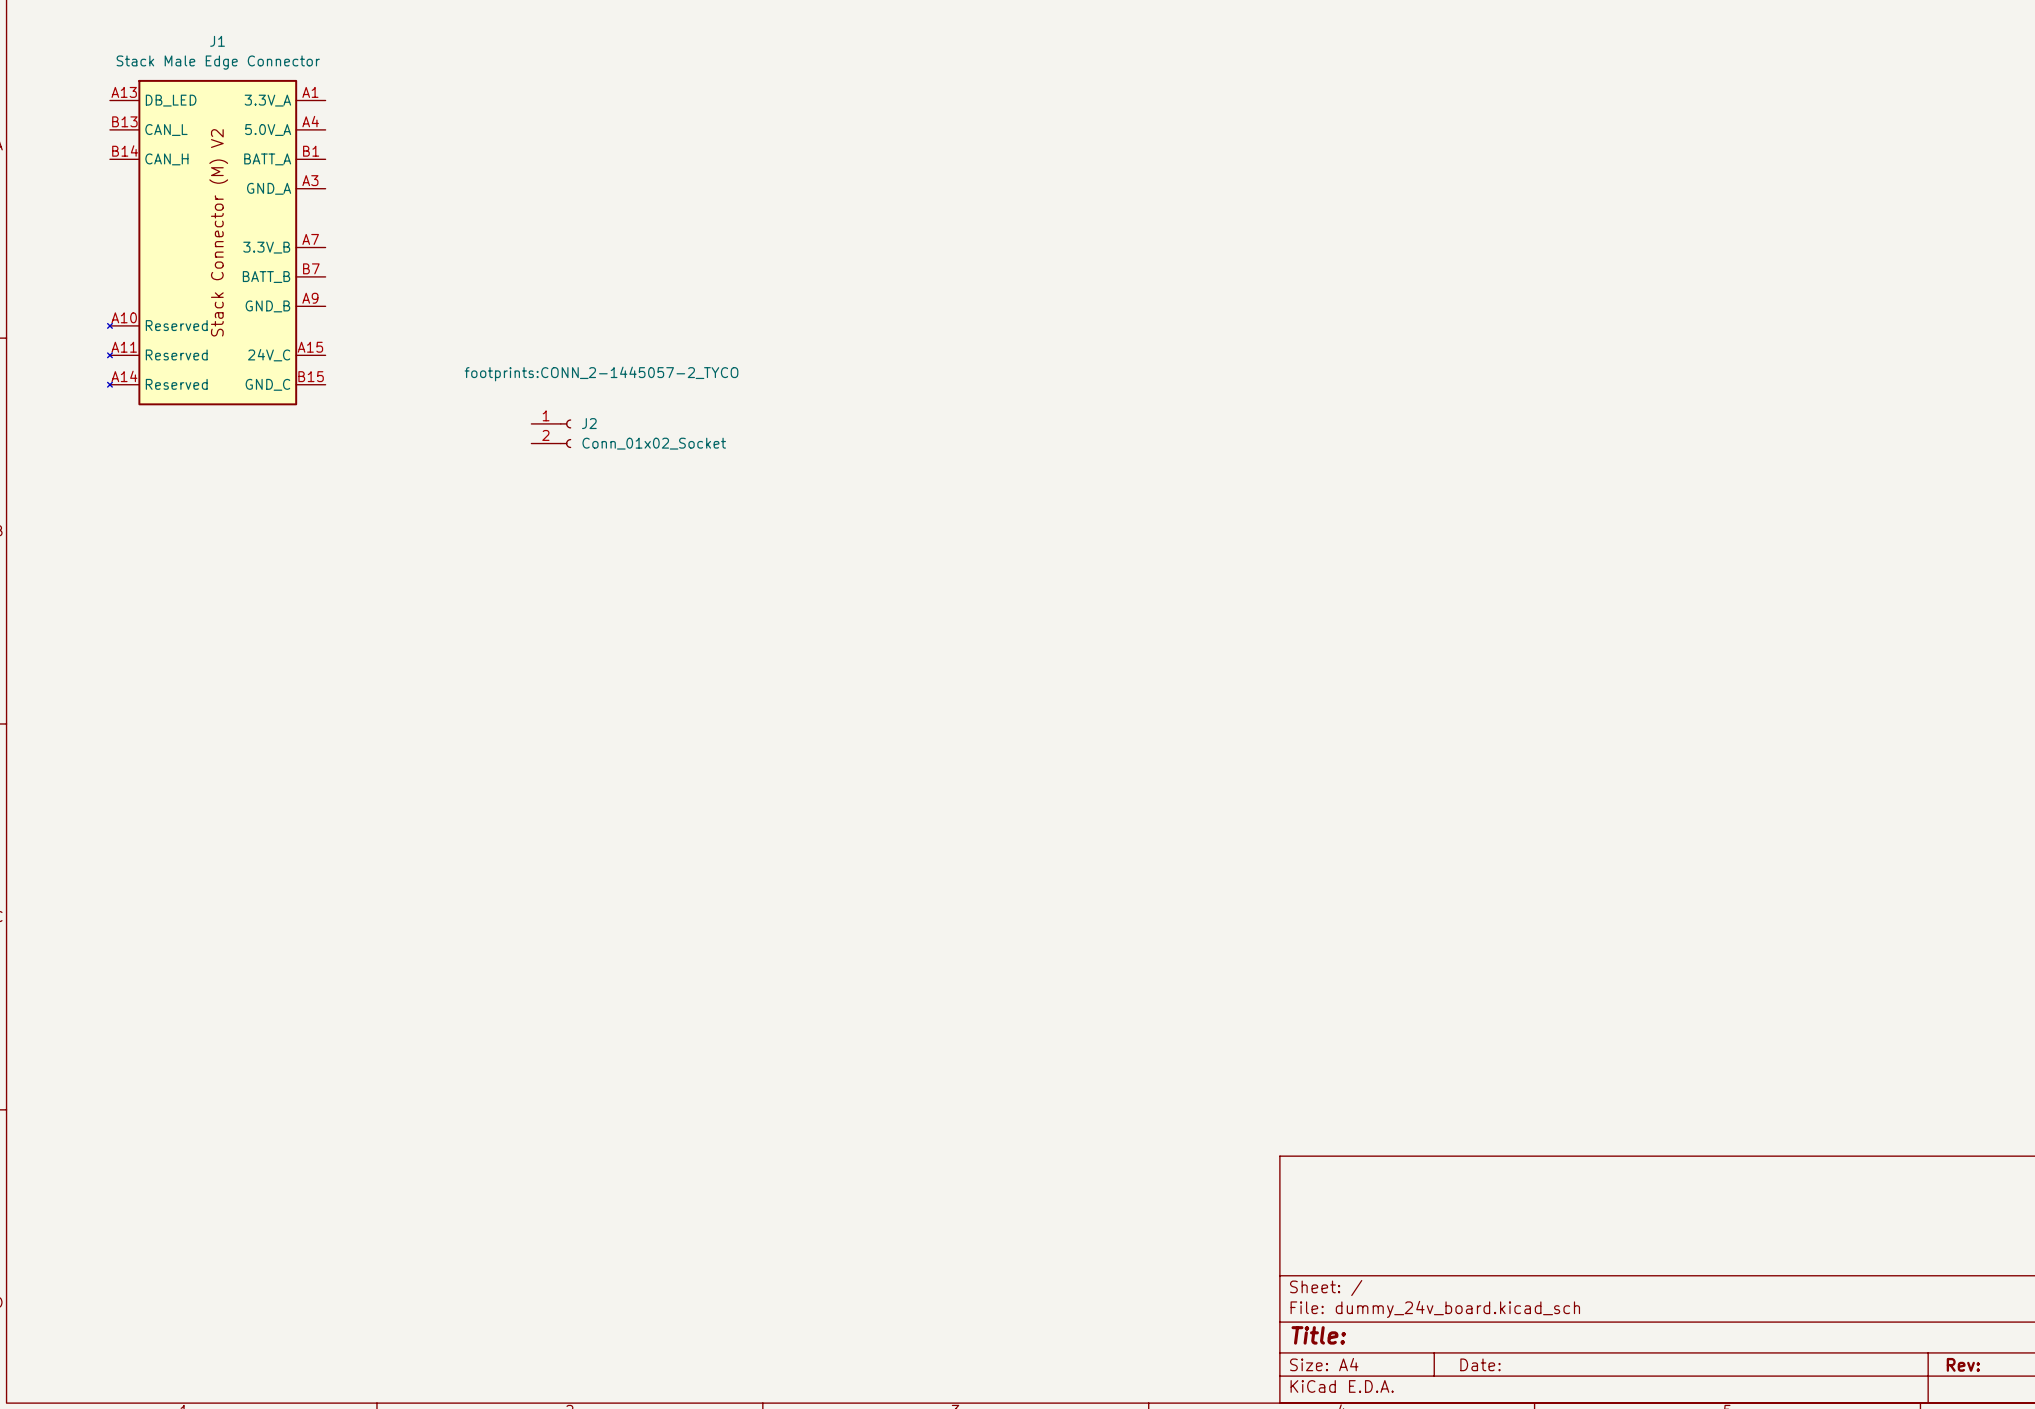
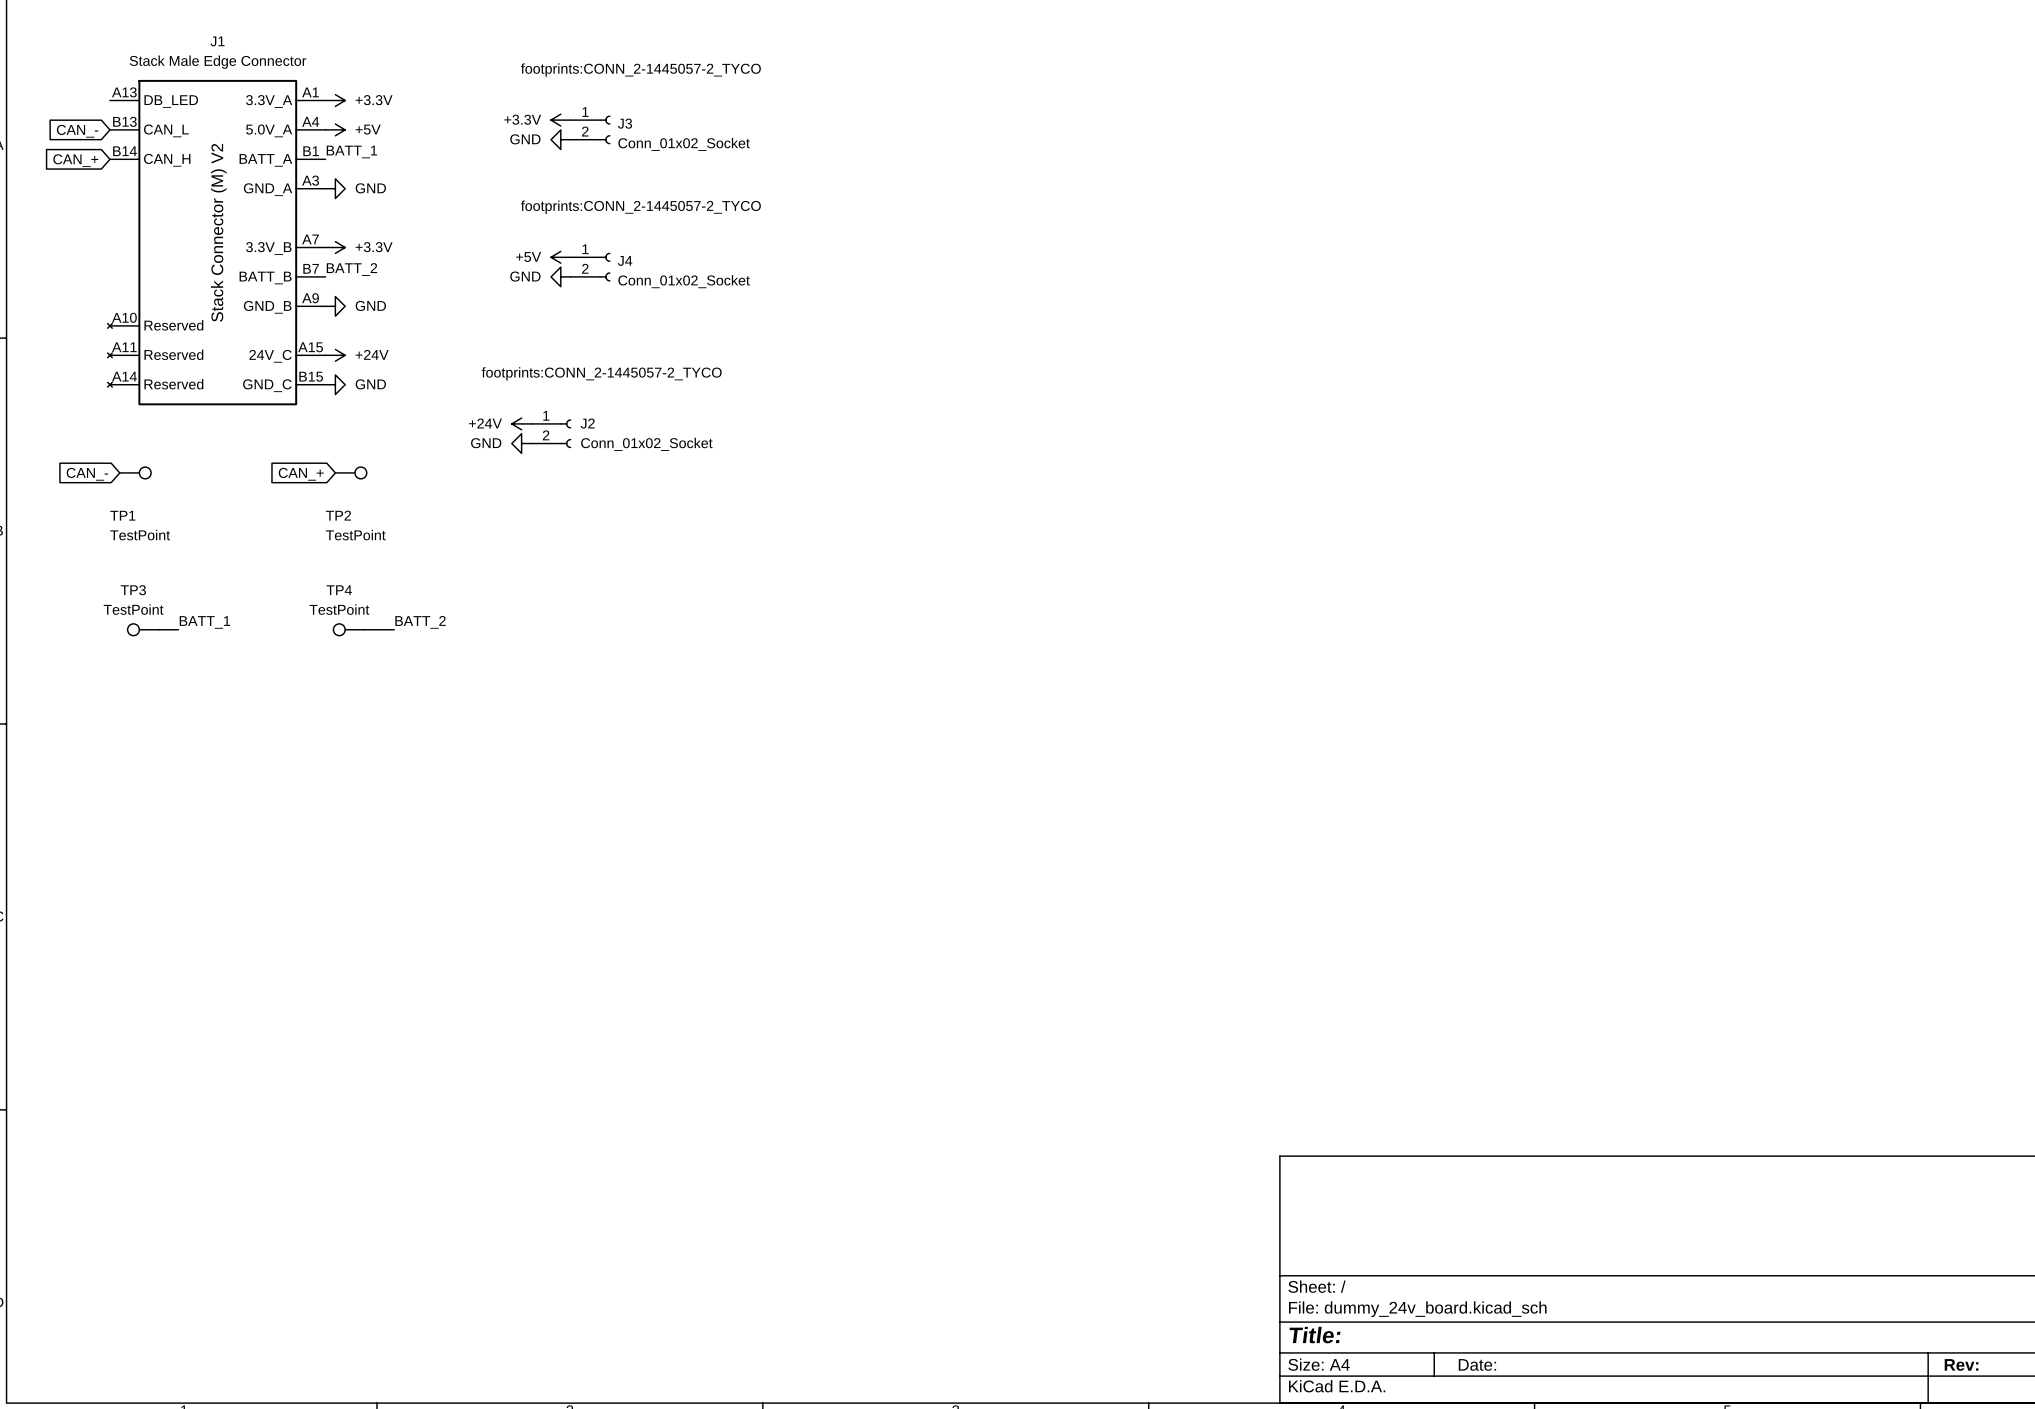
power symbol: none -> +3.3V (335, 100)
power symbol: none -> +3.3V (560, 120)
power symbol: none -> +5V (335, 129)
J3: none -> Conn_01x02_Socket (590, 129)
global label: none -> CAN_- (77, 131)
power symbol: none -> GND (560, 139)
label: none -> BATT_1 (351, 151)
global label: none -> CAN_+ (75, 160)
power symbol: none -> GND (335, 188)
power symbol: none -> +3.3V (335, 247)
power symbol: none -> +5V (560, 257)
J4: none -> Conn_01x02_Socket (590, 267)
label: none -> BATT_2 (351, 269)
power symbol: none -> GND (560, 276)
power symbol: none -> GND (335, 306)
power symbol: none -> +24V (335, 355)
power symbol: none -> GND (335, 384)
power symbol: none -> +24V (521, 423)
power symbol: none -> GND (521, 443)
TP1: none -> TestPoint (135, 472)
TP2: none -> TestPoint (351, 472)
global label: none -> CAN_- (87, 474)
global label: none -> CAN_+ (301, 474)
label: none -> BATT_1 (204, 622)
label: none -> BATT_2 (420, 622)
TP3: none -> TestPoint (143, 629)
wire: none -> (158, 629) (178, 629)
TP4: none -> TestPoint (349, 629)
wire: none -> (364, 629) (394, 629)

